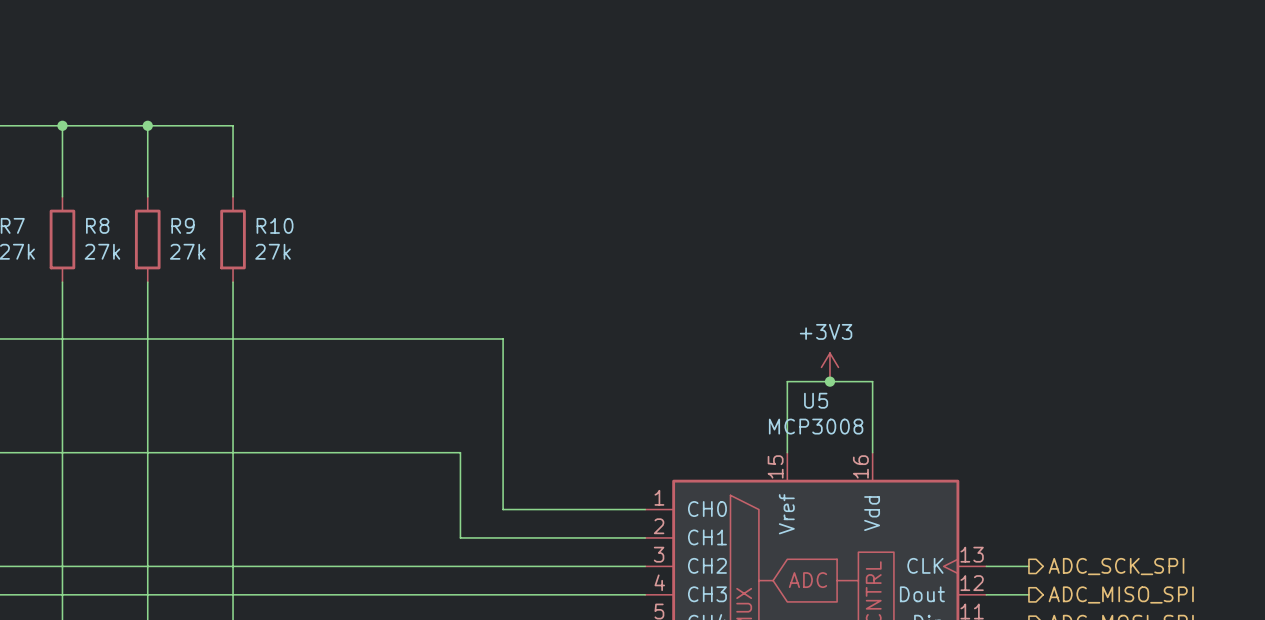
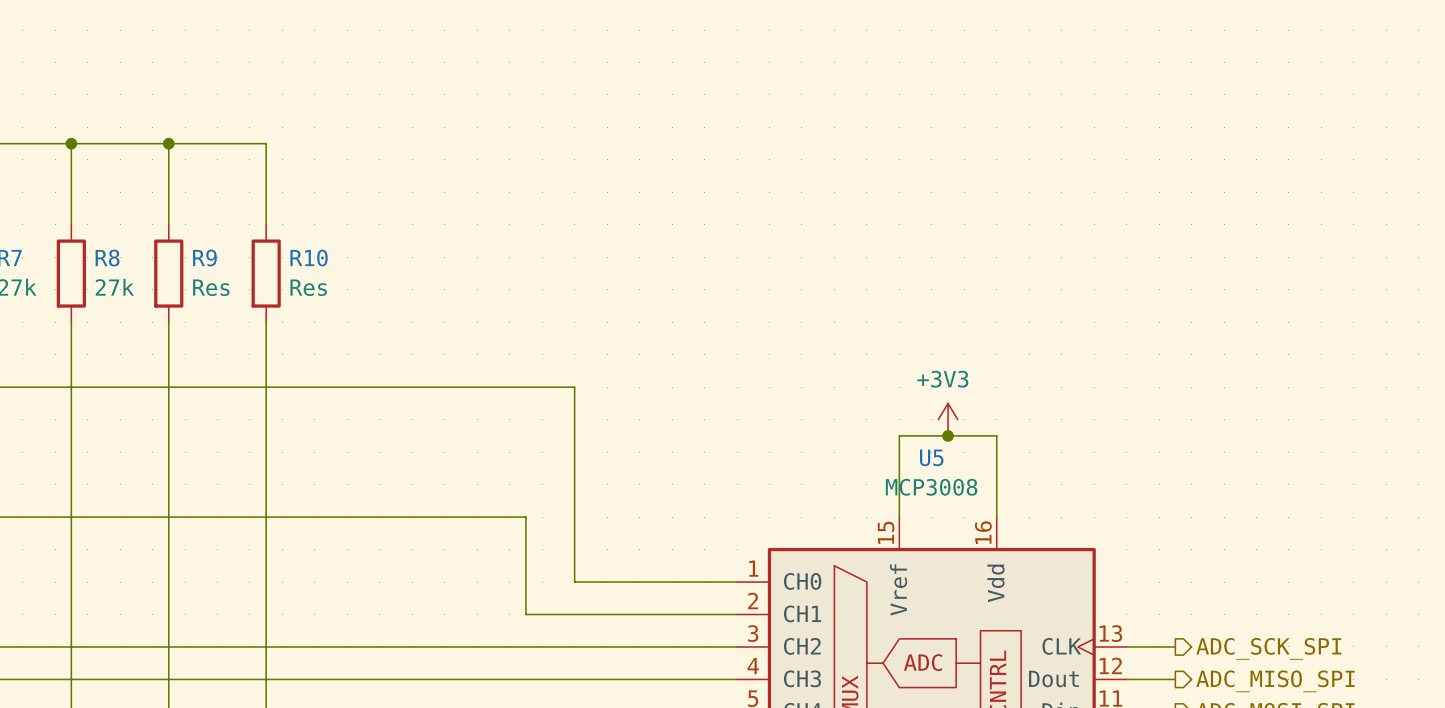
R9 value: 27k (187, 251) -> Res (211, 287)
R10 value: 27k (273, 251) -> Res (308, 287)

